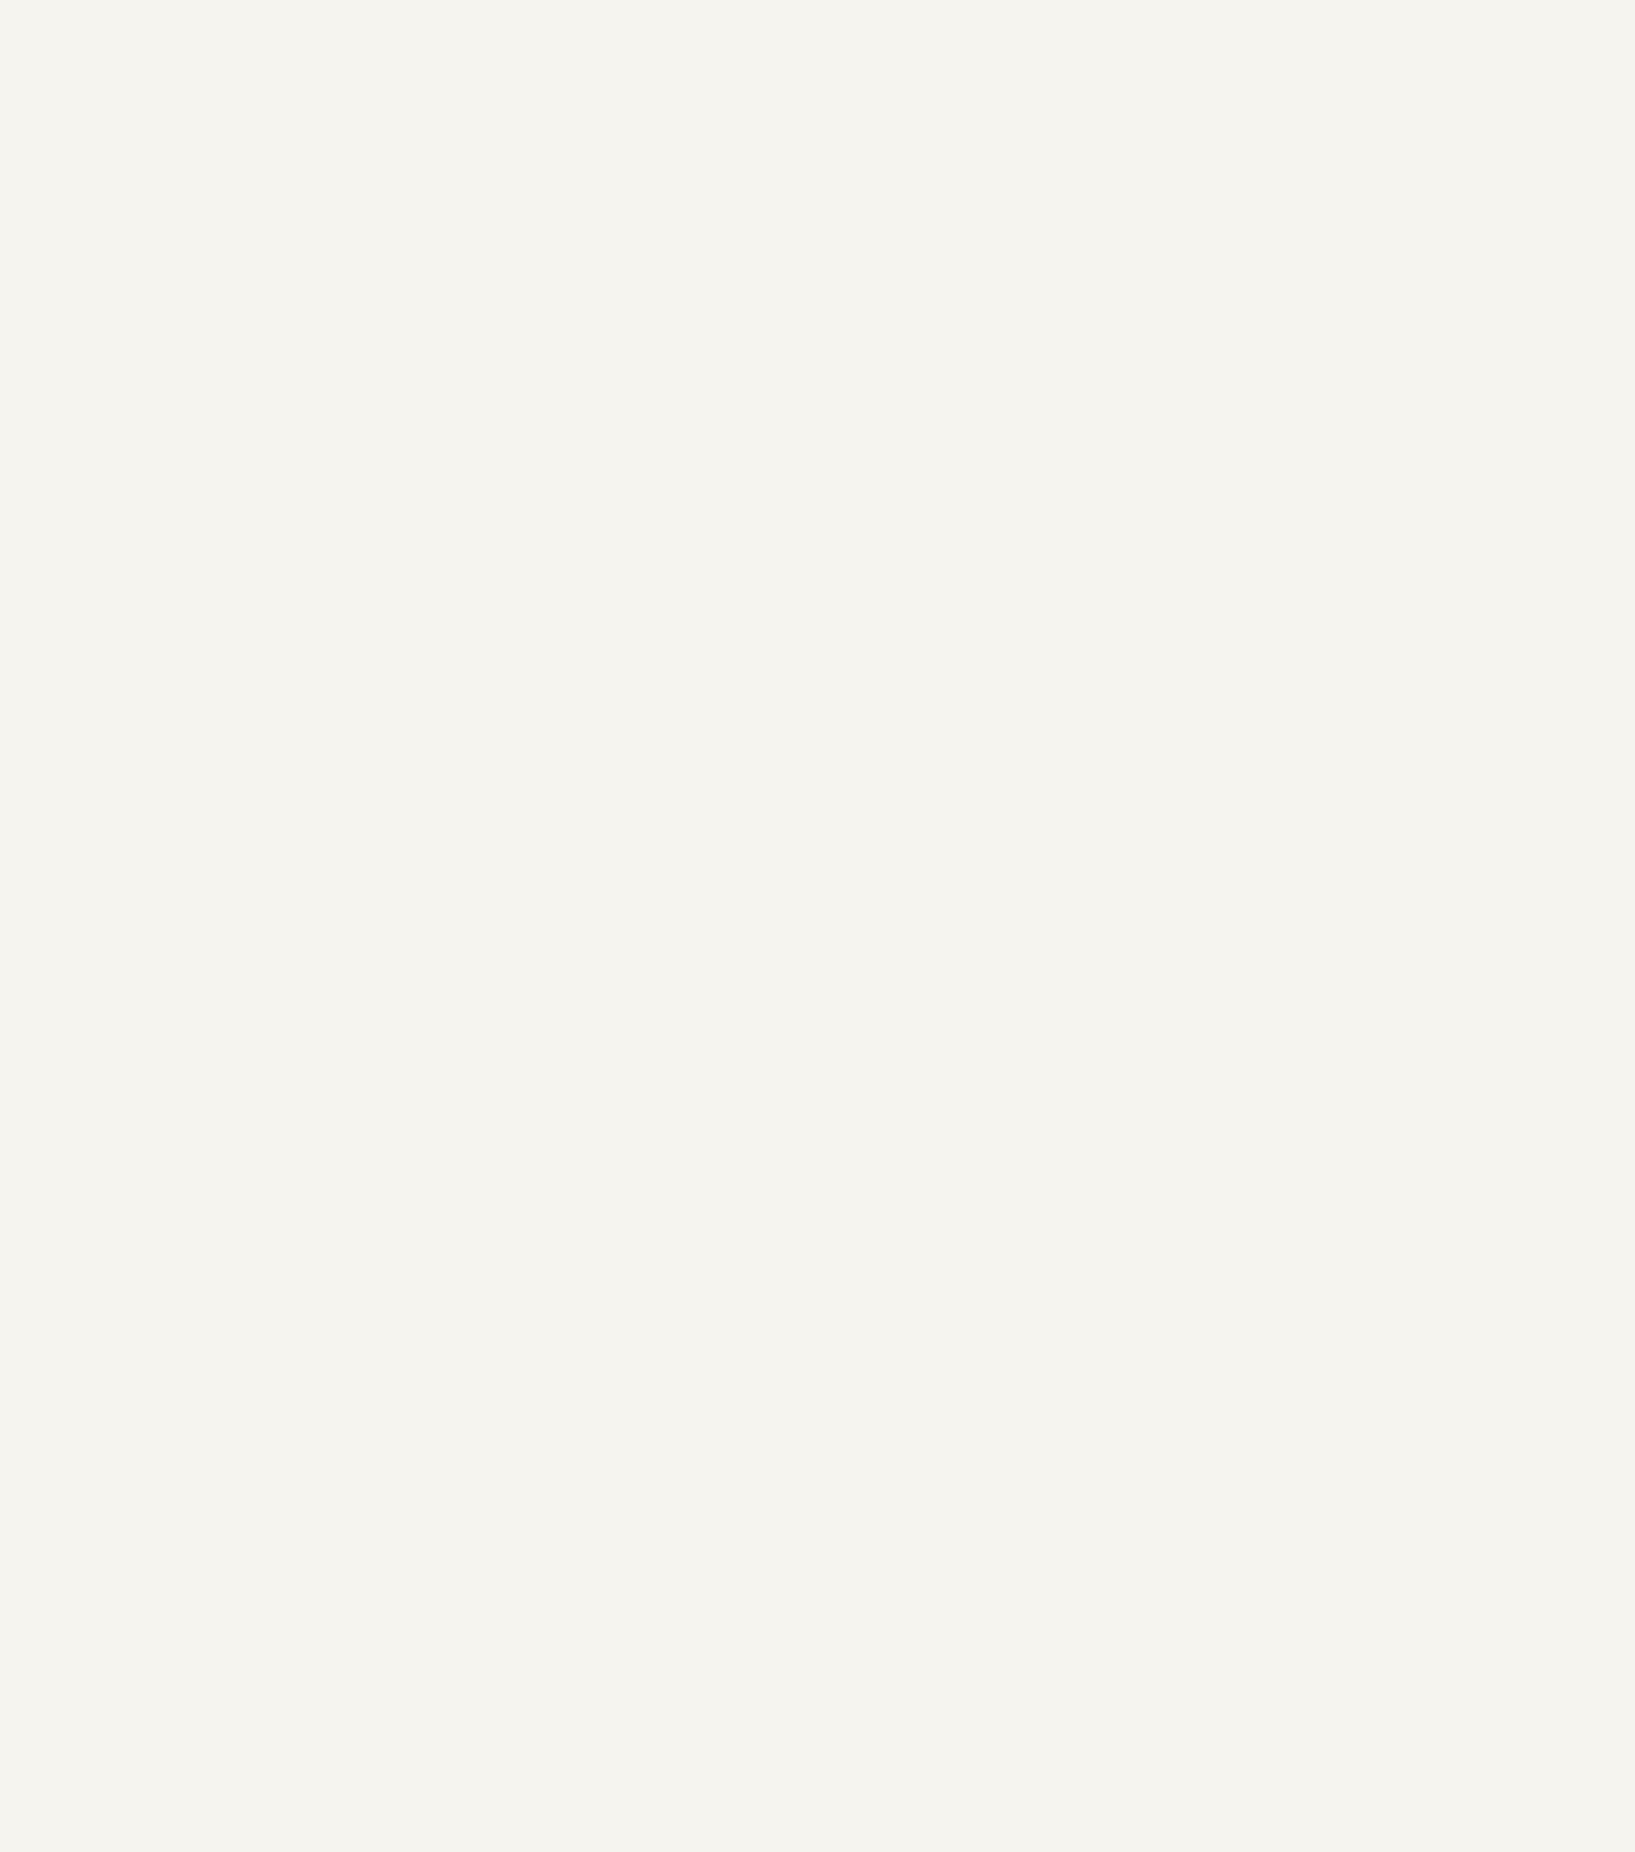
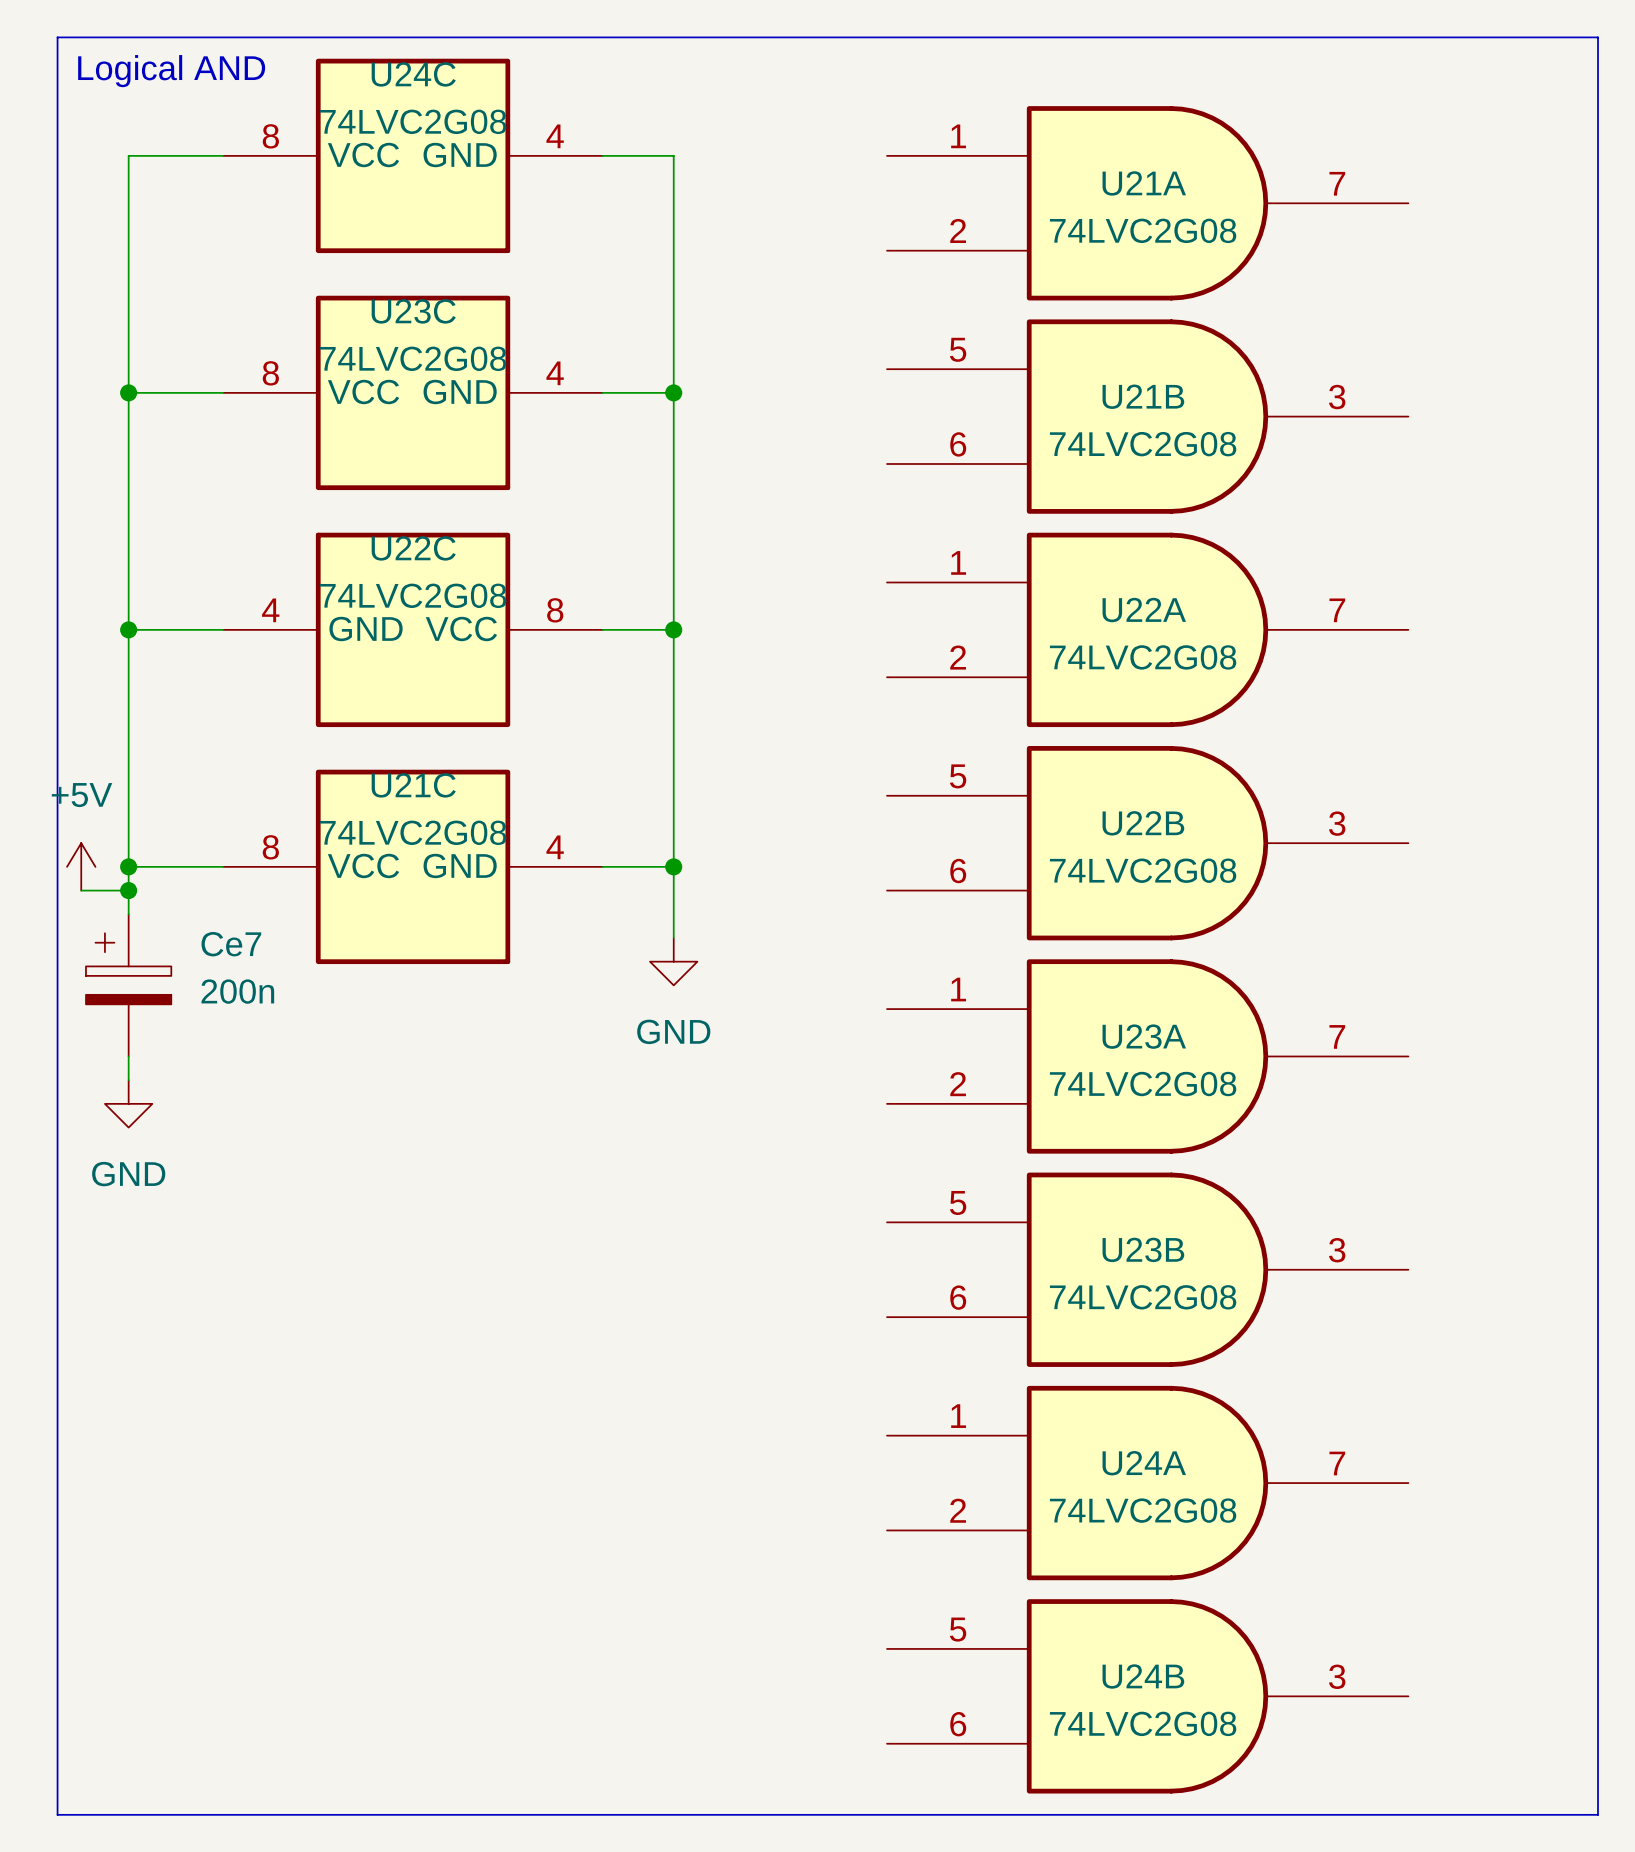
line: none -> (57, 37) (1597, 37) (1597, 1814) (57, 1814) (57, 37)
text: none -> Logical AND (171, 71)
wire: none -> (223, 155) (128, 155) (128, 914)
U24C: none -> 74LVC2G08 (413, 155)
wire: none -> (602, 155) (673, 155) (673, 937)
U21A: none -> 74LVC2G08 (1147, 203)
wire: none -> (128, 392) (223, 392)
junction: none -> (128, 392)
U23C: none -> 74LVC2G08 (413, 392)
wire: none -> (602, 392) (673, 392)
junction: none -> (673, 392)
U21B: none -> 74LVC2G08 (1147, 416)
wire: none -> (128, 629) (223, 629)
junction: none -> (128, 629)
U22C: none -> 74LVC2G08 (413, 629)
wire: none -> (602, 629) (673, 629)
junction: none -> (673, 629)
U22A: none -> 74LVC2G08 (1147, 629)
U22B: none -> 74LVC2G08 (1147, 843)
power symbol: none -> +5V (81, 866)
wire: none -> (128, 866) (223, 866)
junction: none -> (128, 866)
U21C: none -> 74LVC2G08 (413, 866)
wire: none -> (602, 866) (673, 866)
junction: none -> (673, 866)
wire: none -> (81, 890) (128, 890)
junction: none -> (128, 890)
power symbol: none -> GND (673, 961)
Ce7: none -> 200n (128, 985)
wire: none -> (128, 1056) (128, 1080)
U23A: none -> 74LVC2G08 (1147, 1056)
power symbol: none -> GND (128, 1103)
U23B: none -> 74LVC2G08 (1147, 1269)
U24A: none -> 74LVC2G08 (1147, 1483)
U24B: none -> 74LVC2G08 (1147, 1696)

